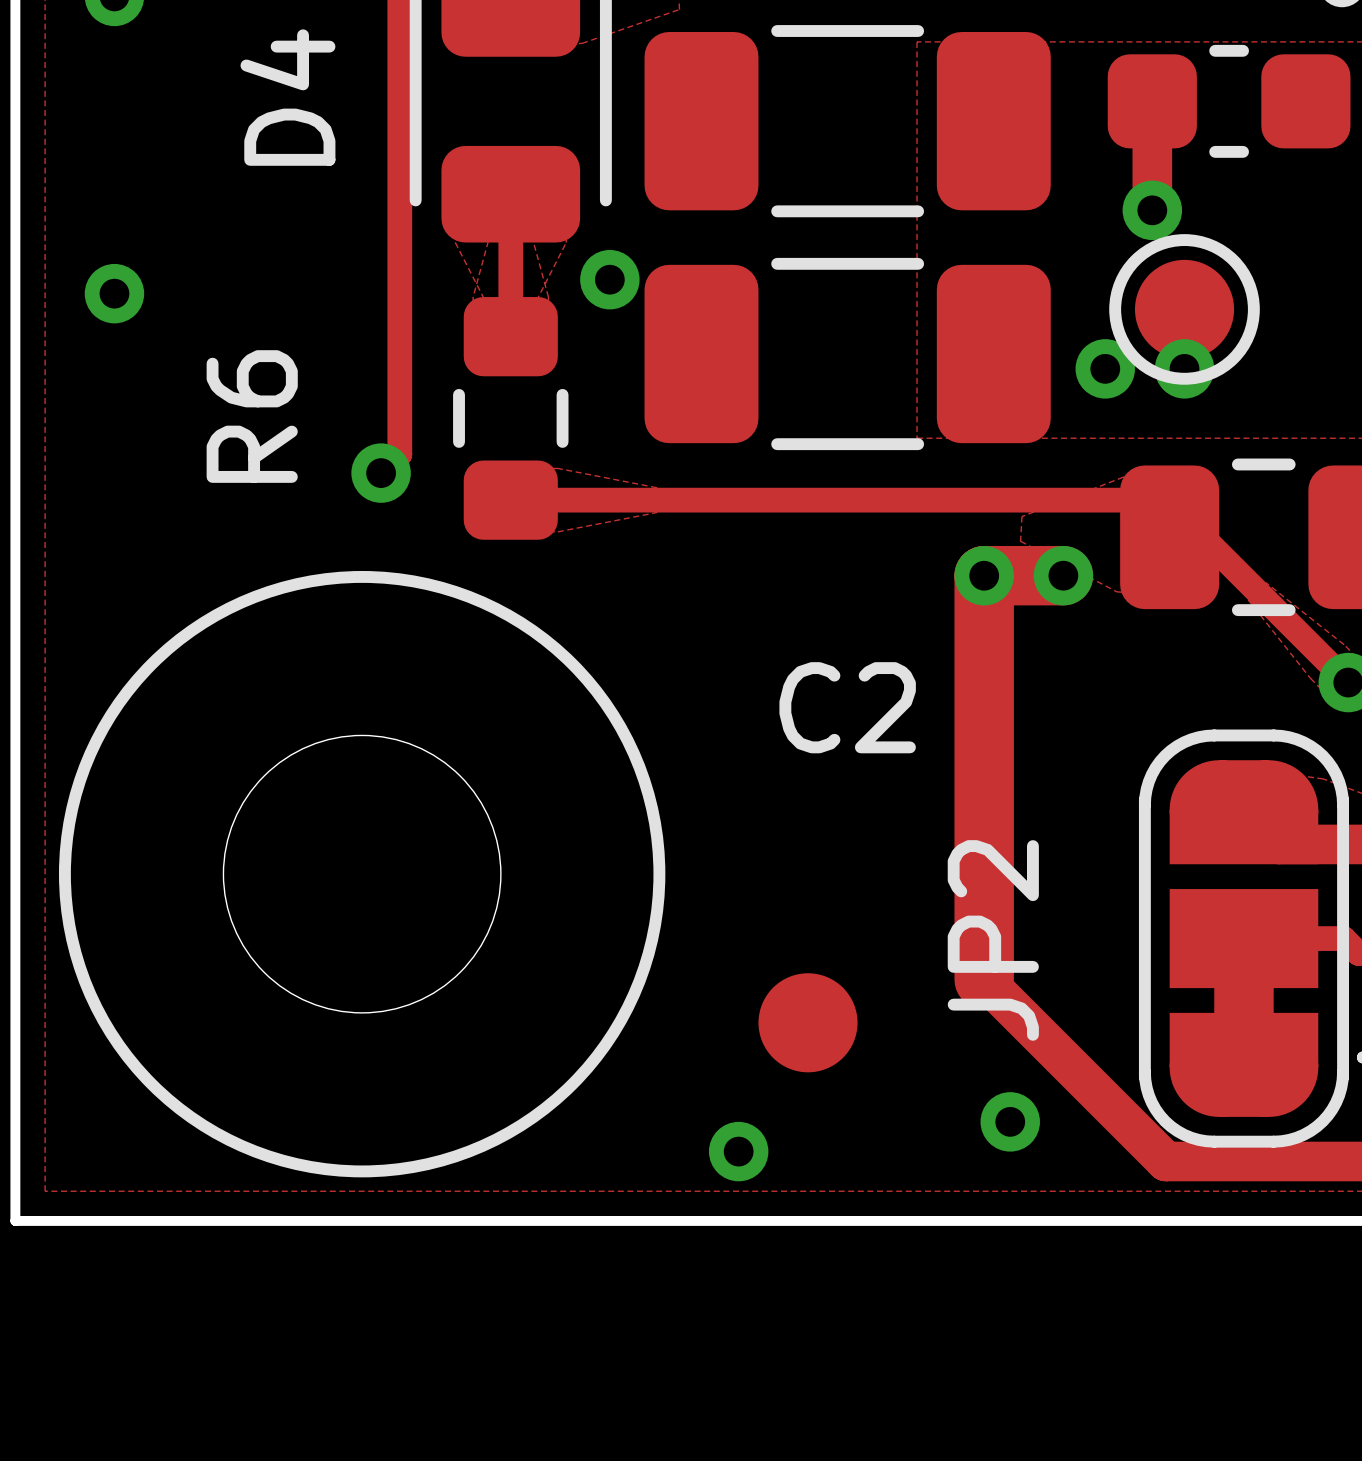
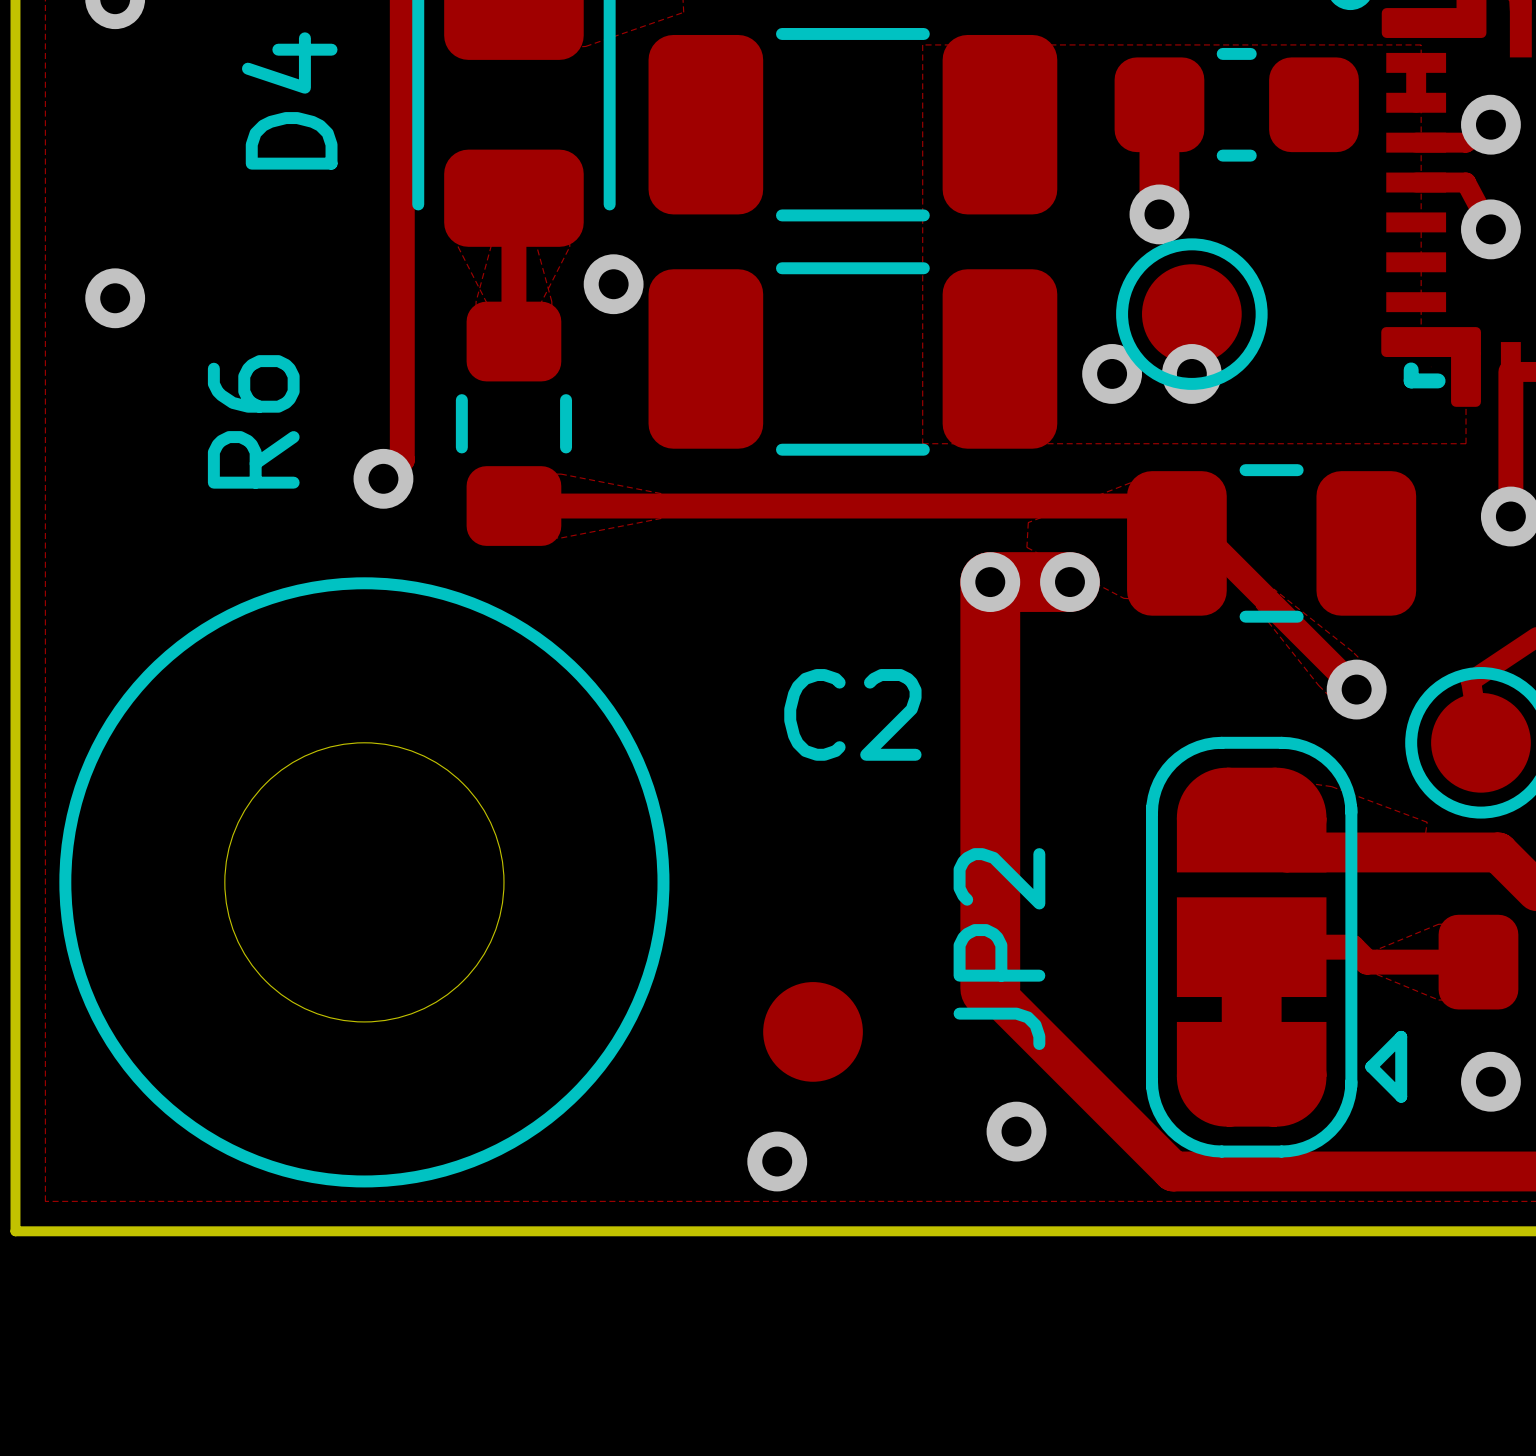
via position: (738, 1151) -> (777, 1161)

